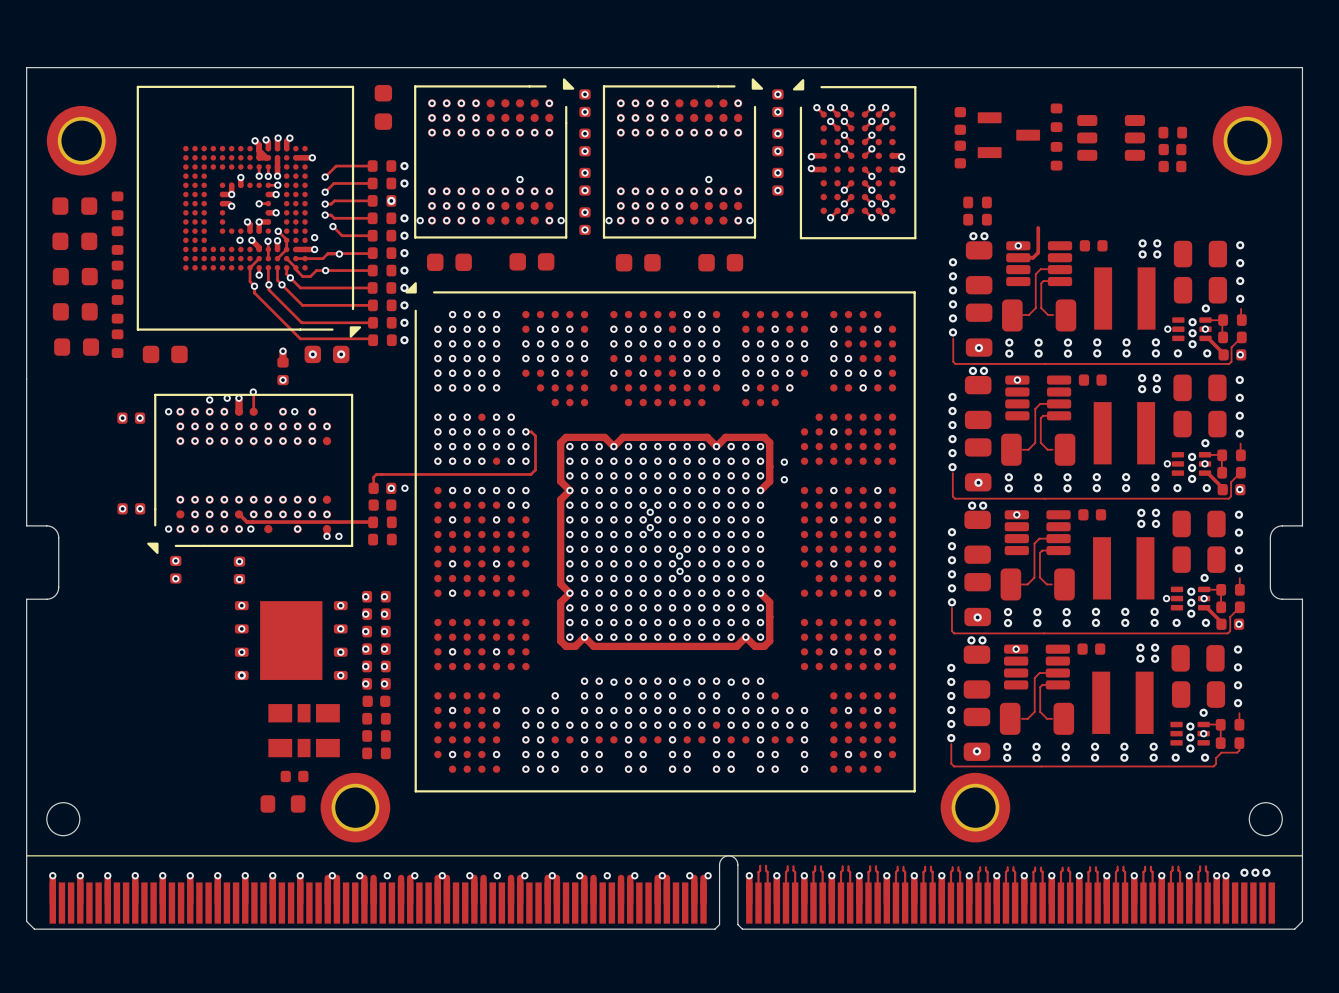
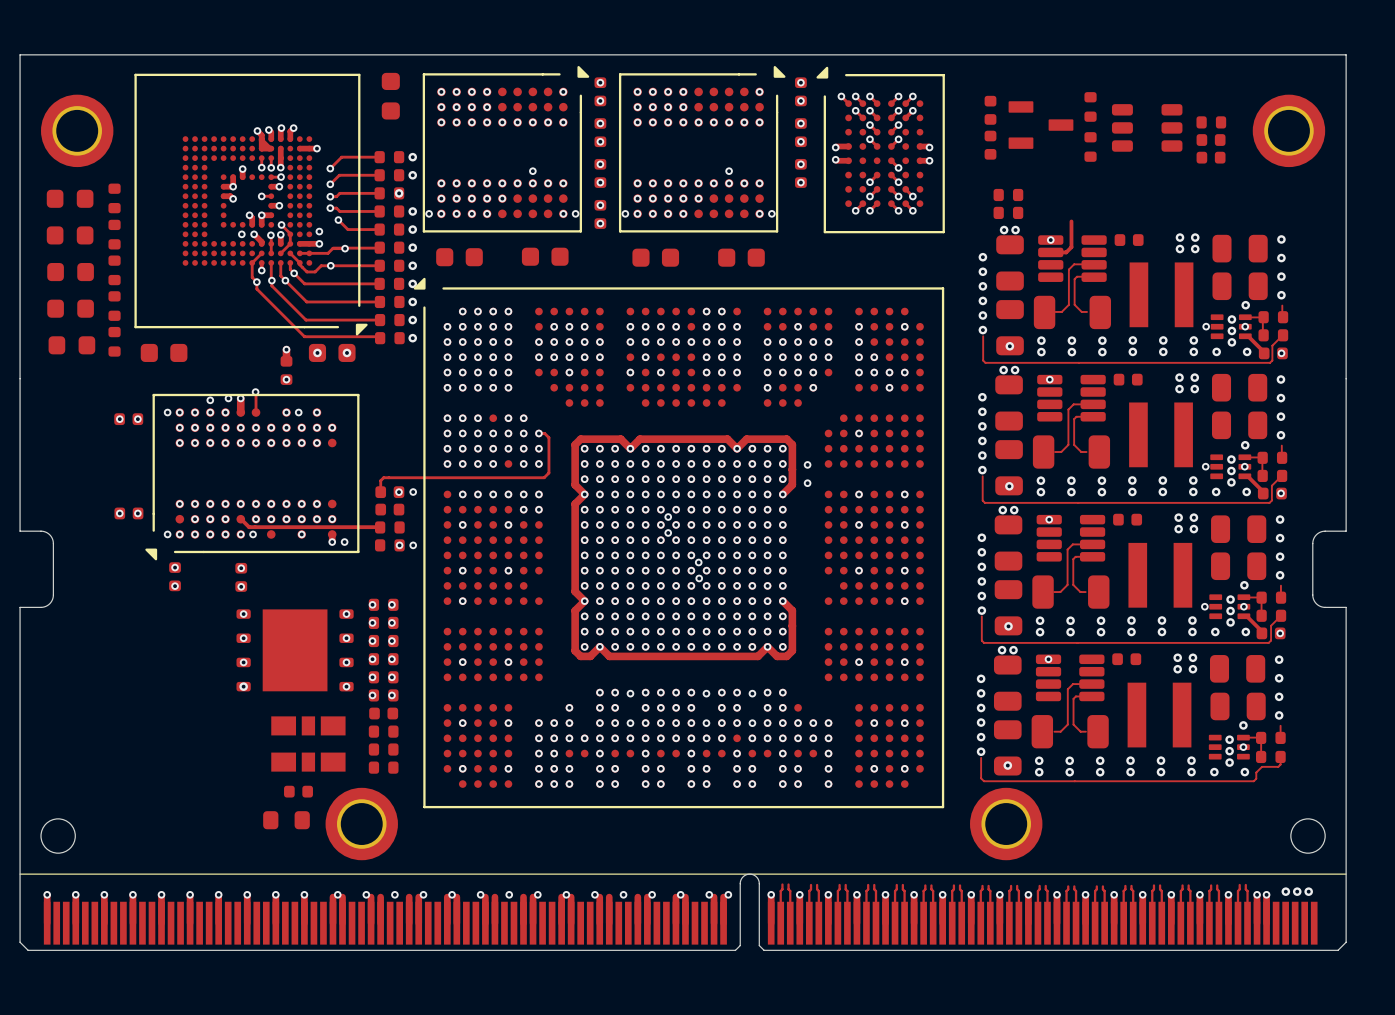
via: none -> (399, 545)
via: none -> (413, 545)

